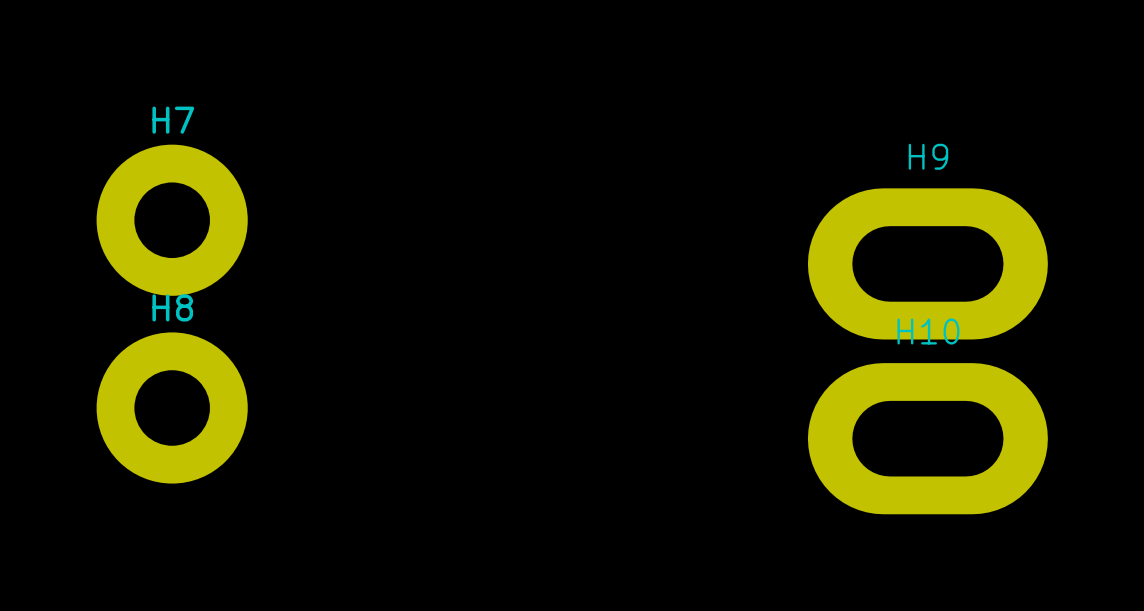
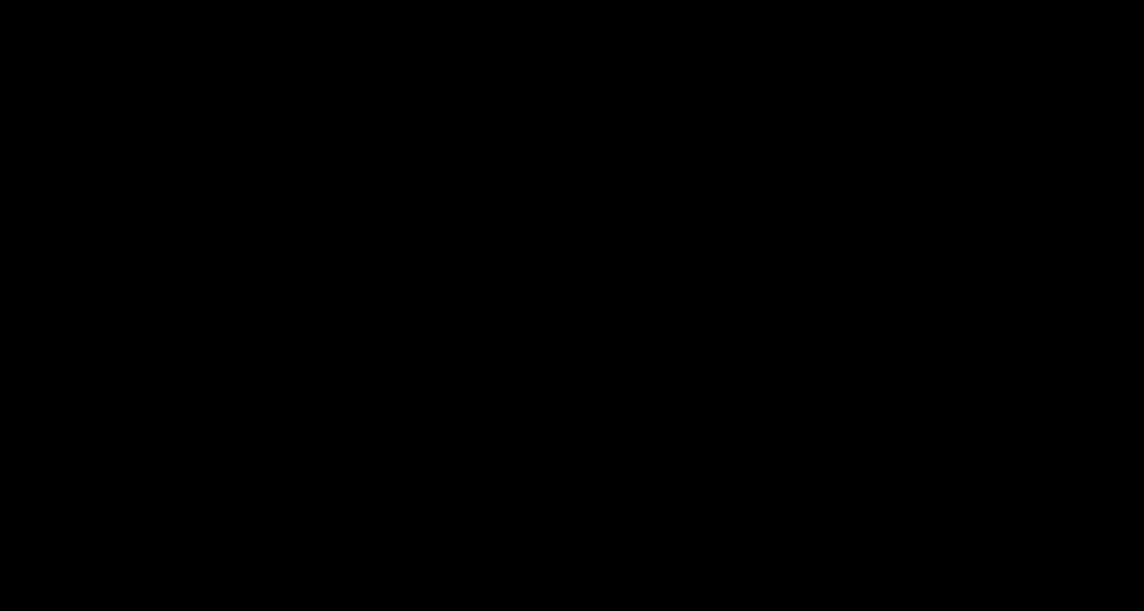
H7: (172, 220) -> none
H9: (927, 263) -> none
H8: (172, 407) -> none
H10: (927, 438) -> none

